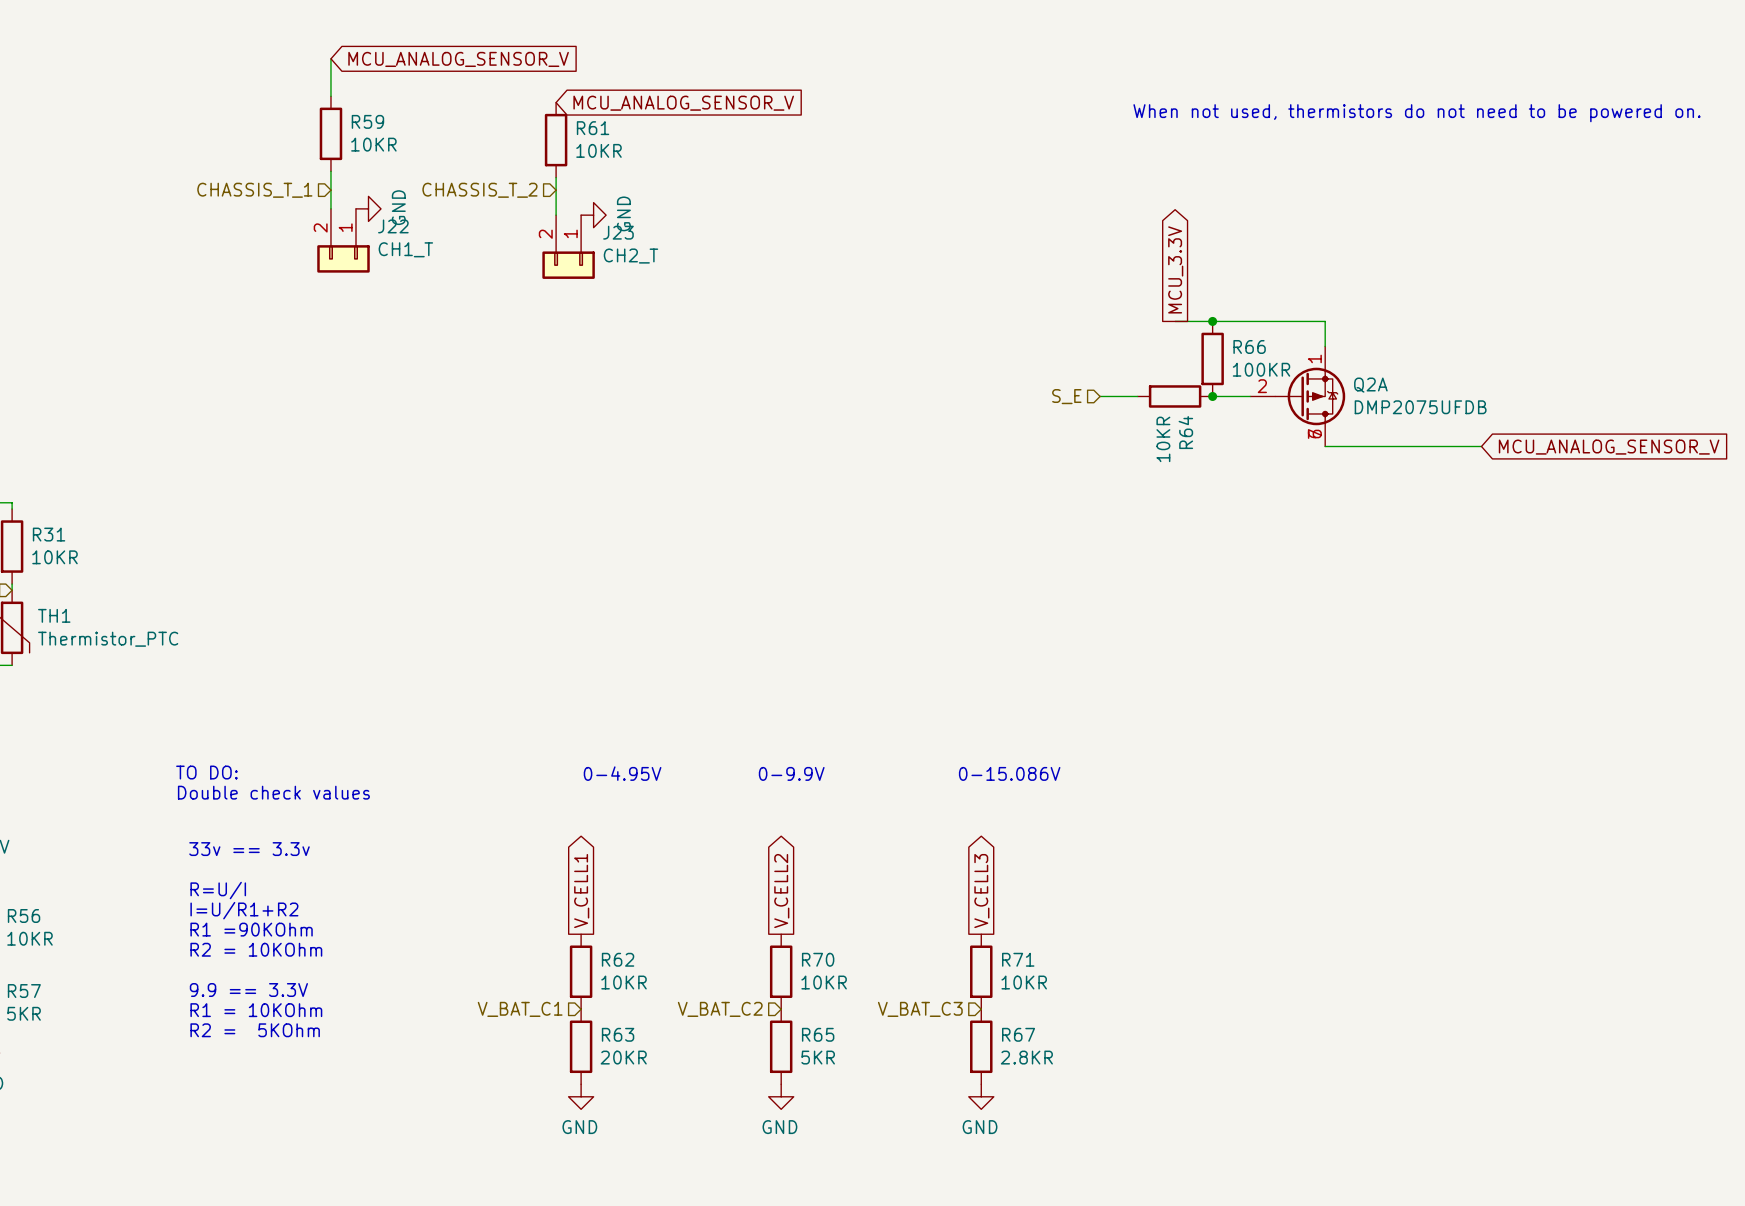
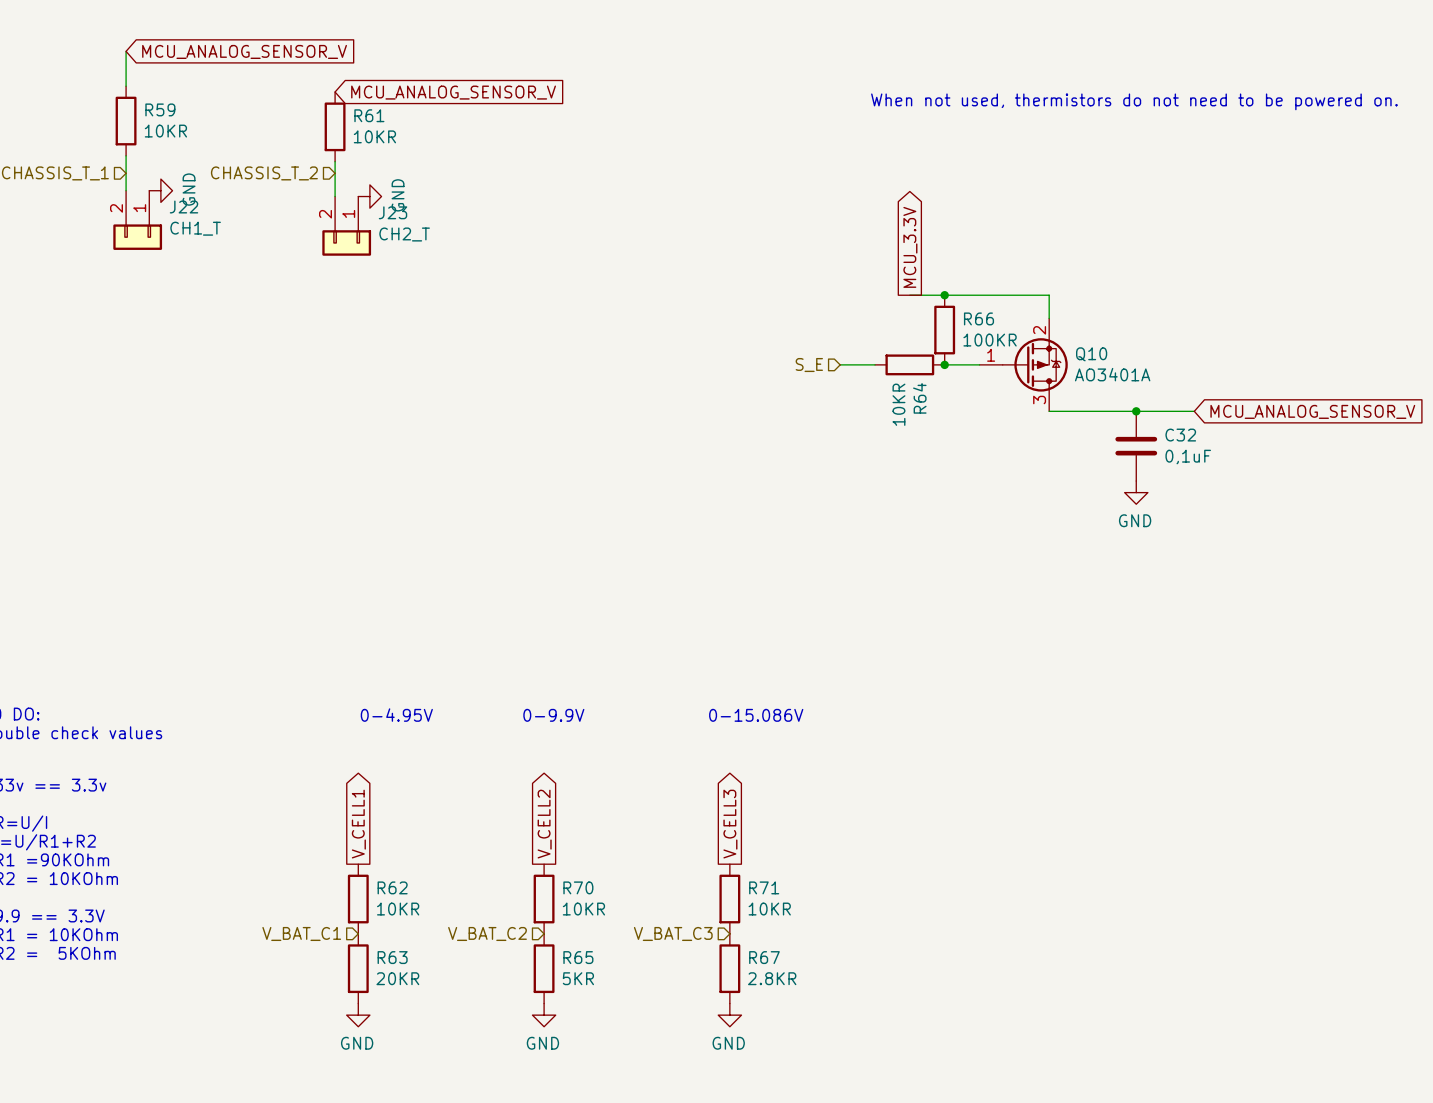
Q2A symbol: [1250, 346, 1346, 447] -> [979, 318, 1068, 412]
Q2A name: Q2A (1370, 385) -> Q10 (1091, 354)
Q2A value: DMP2075UFDB (1420, 407) -> AO3401A (1112, 374)
junction: none -> (1136, 411)
C32: none -> 0,1uF (1136, 446)
power symbol: none -> GND (1136, 492)

